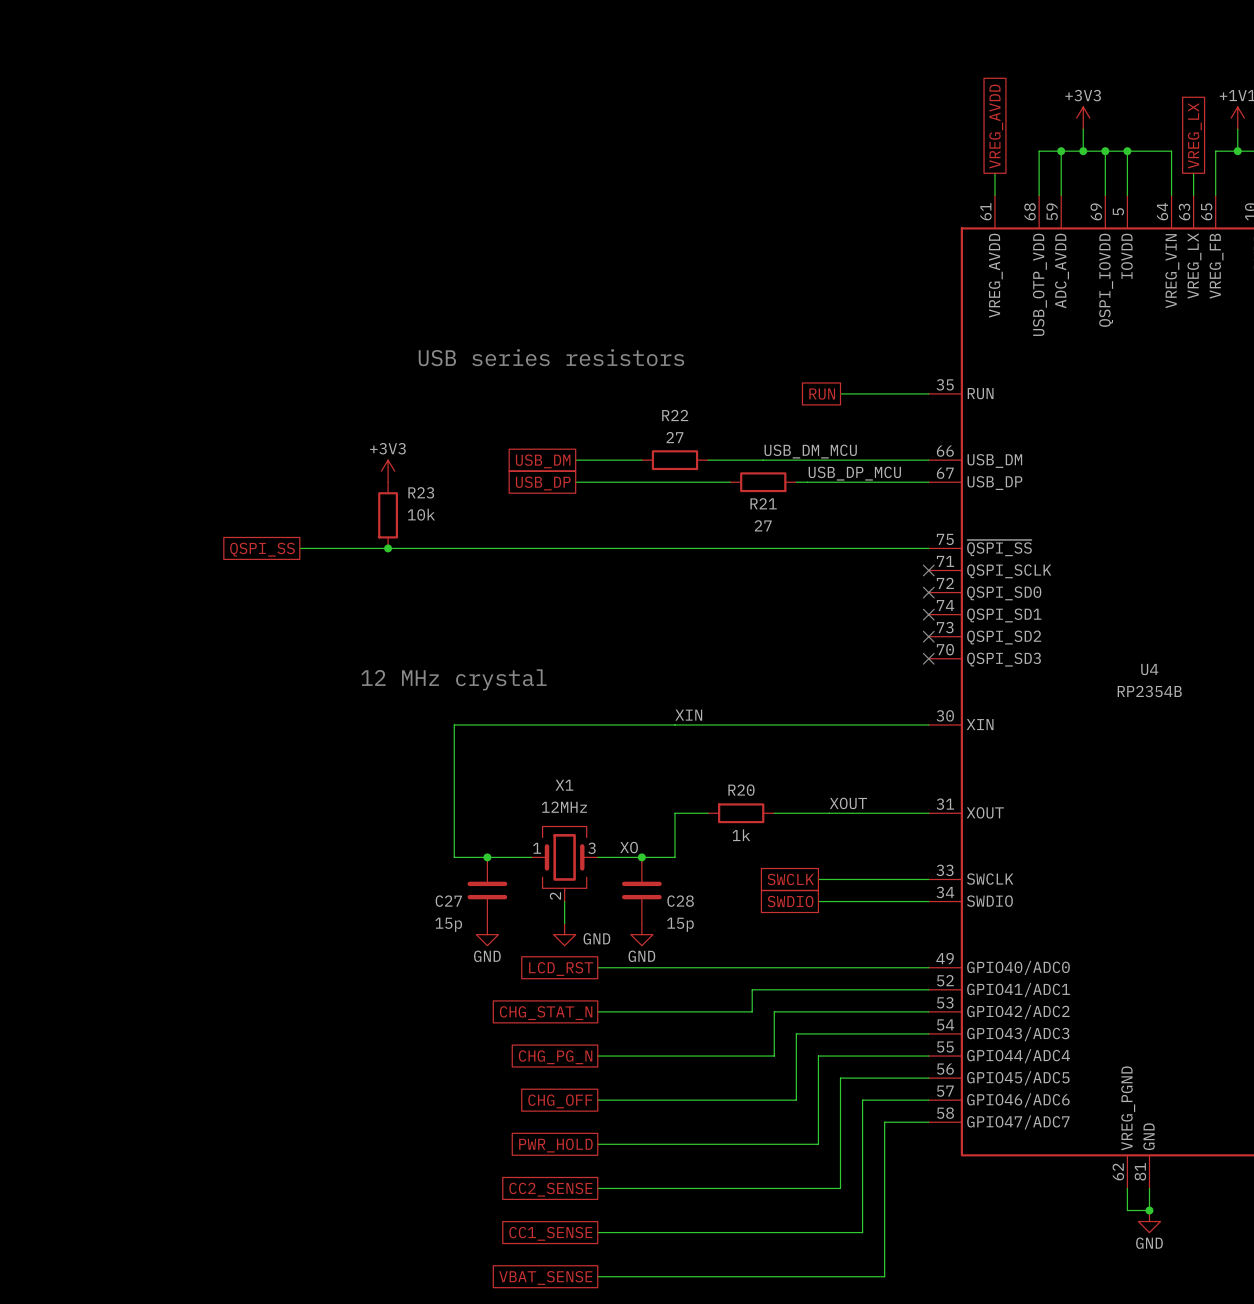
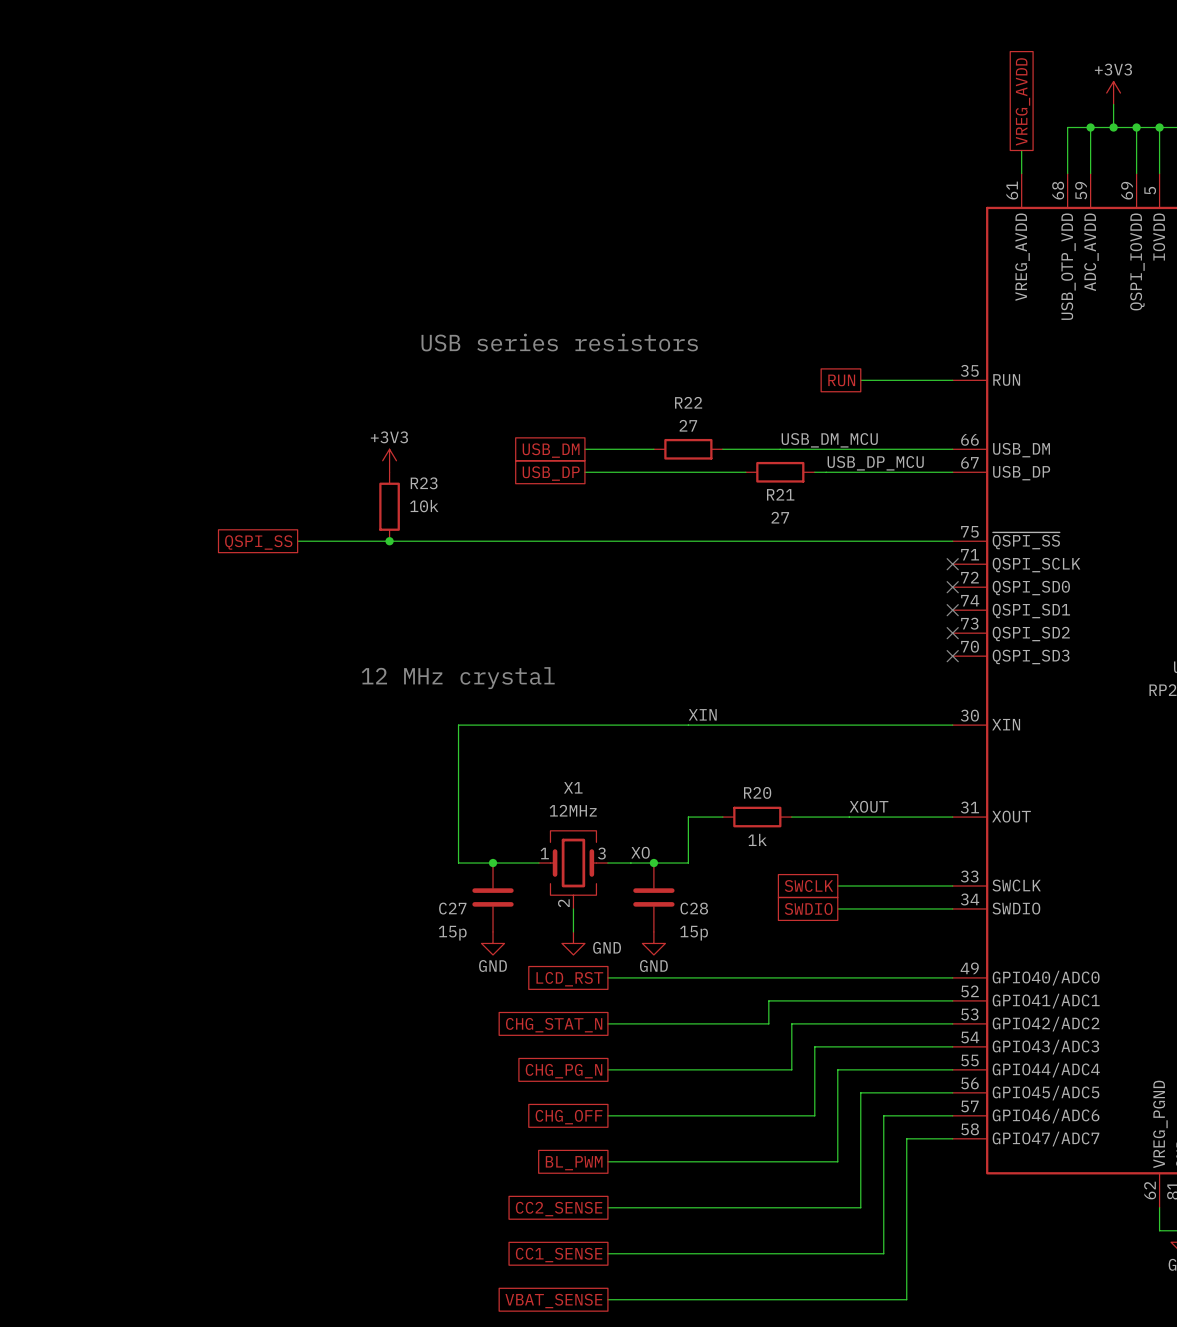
global label: PWR_HOLD (555, 1145) -> BL_PWM (574, 1163)

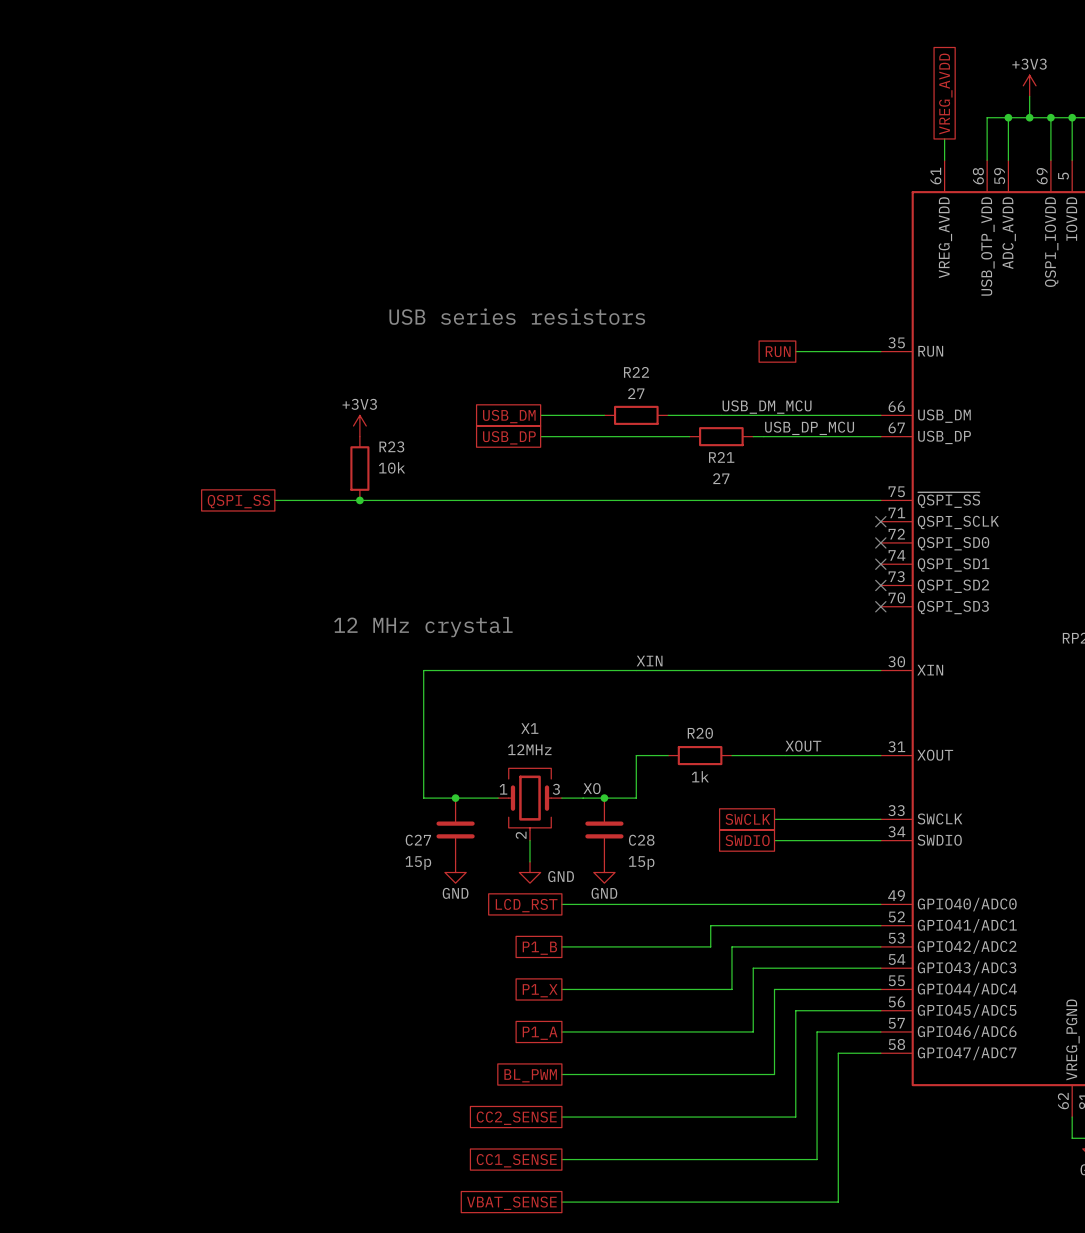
global label: CHG_STAT_N (554, 1025) -> P1_B (539, 948)
global label: CHG_PG_N (564, 1071) -> P1_X (540, 990)
global label: CHG_OFF (569, 1117) -> P1_A (540, 1033)

